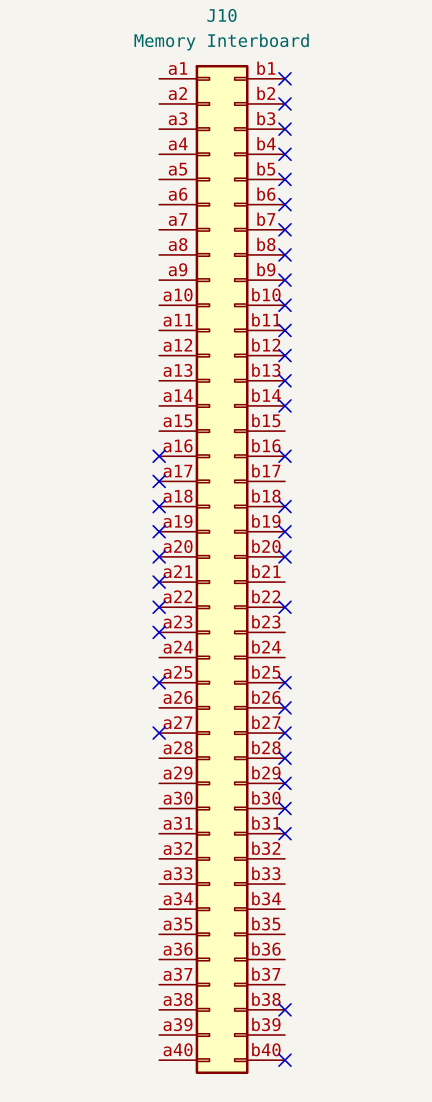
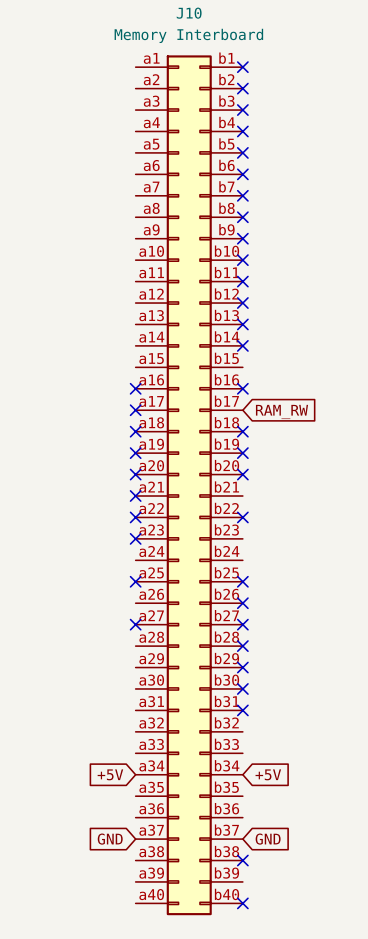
global label: none -> RAM_RW (281, 411)
global label: none -> +5V (110, 774)
global label: none -> +5V (268, 774)
global label: none -> GND (110, 839)
global label: none -> GND (268, 839)

